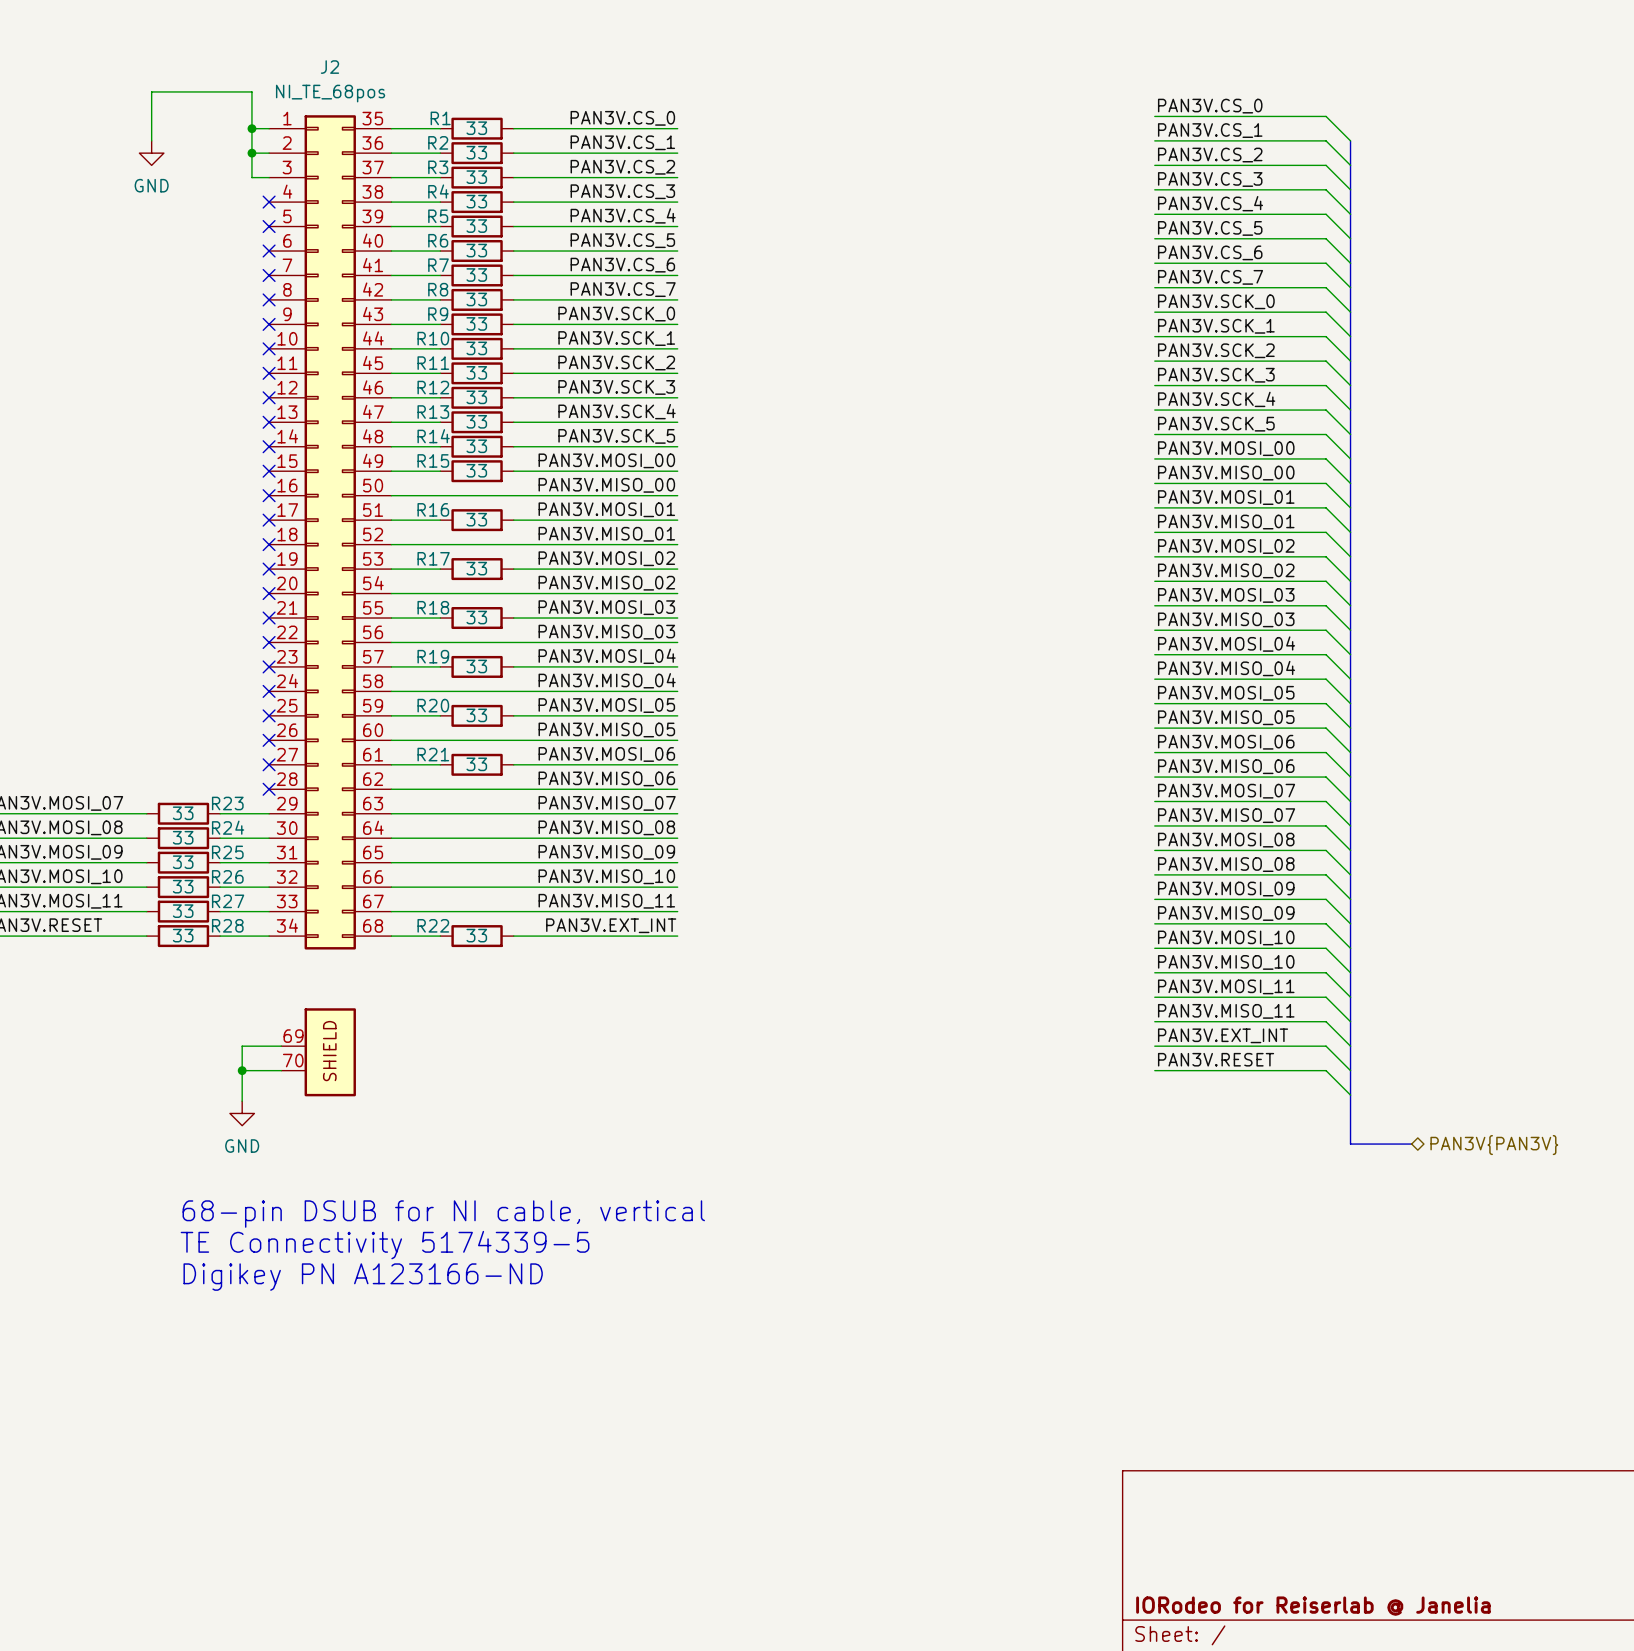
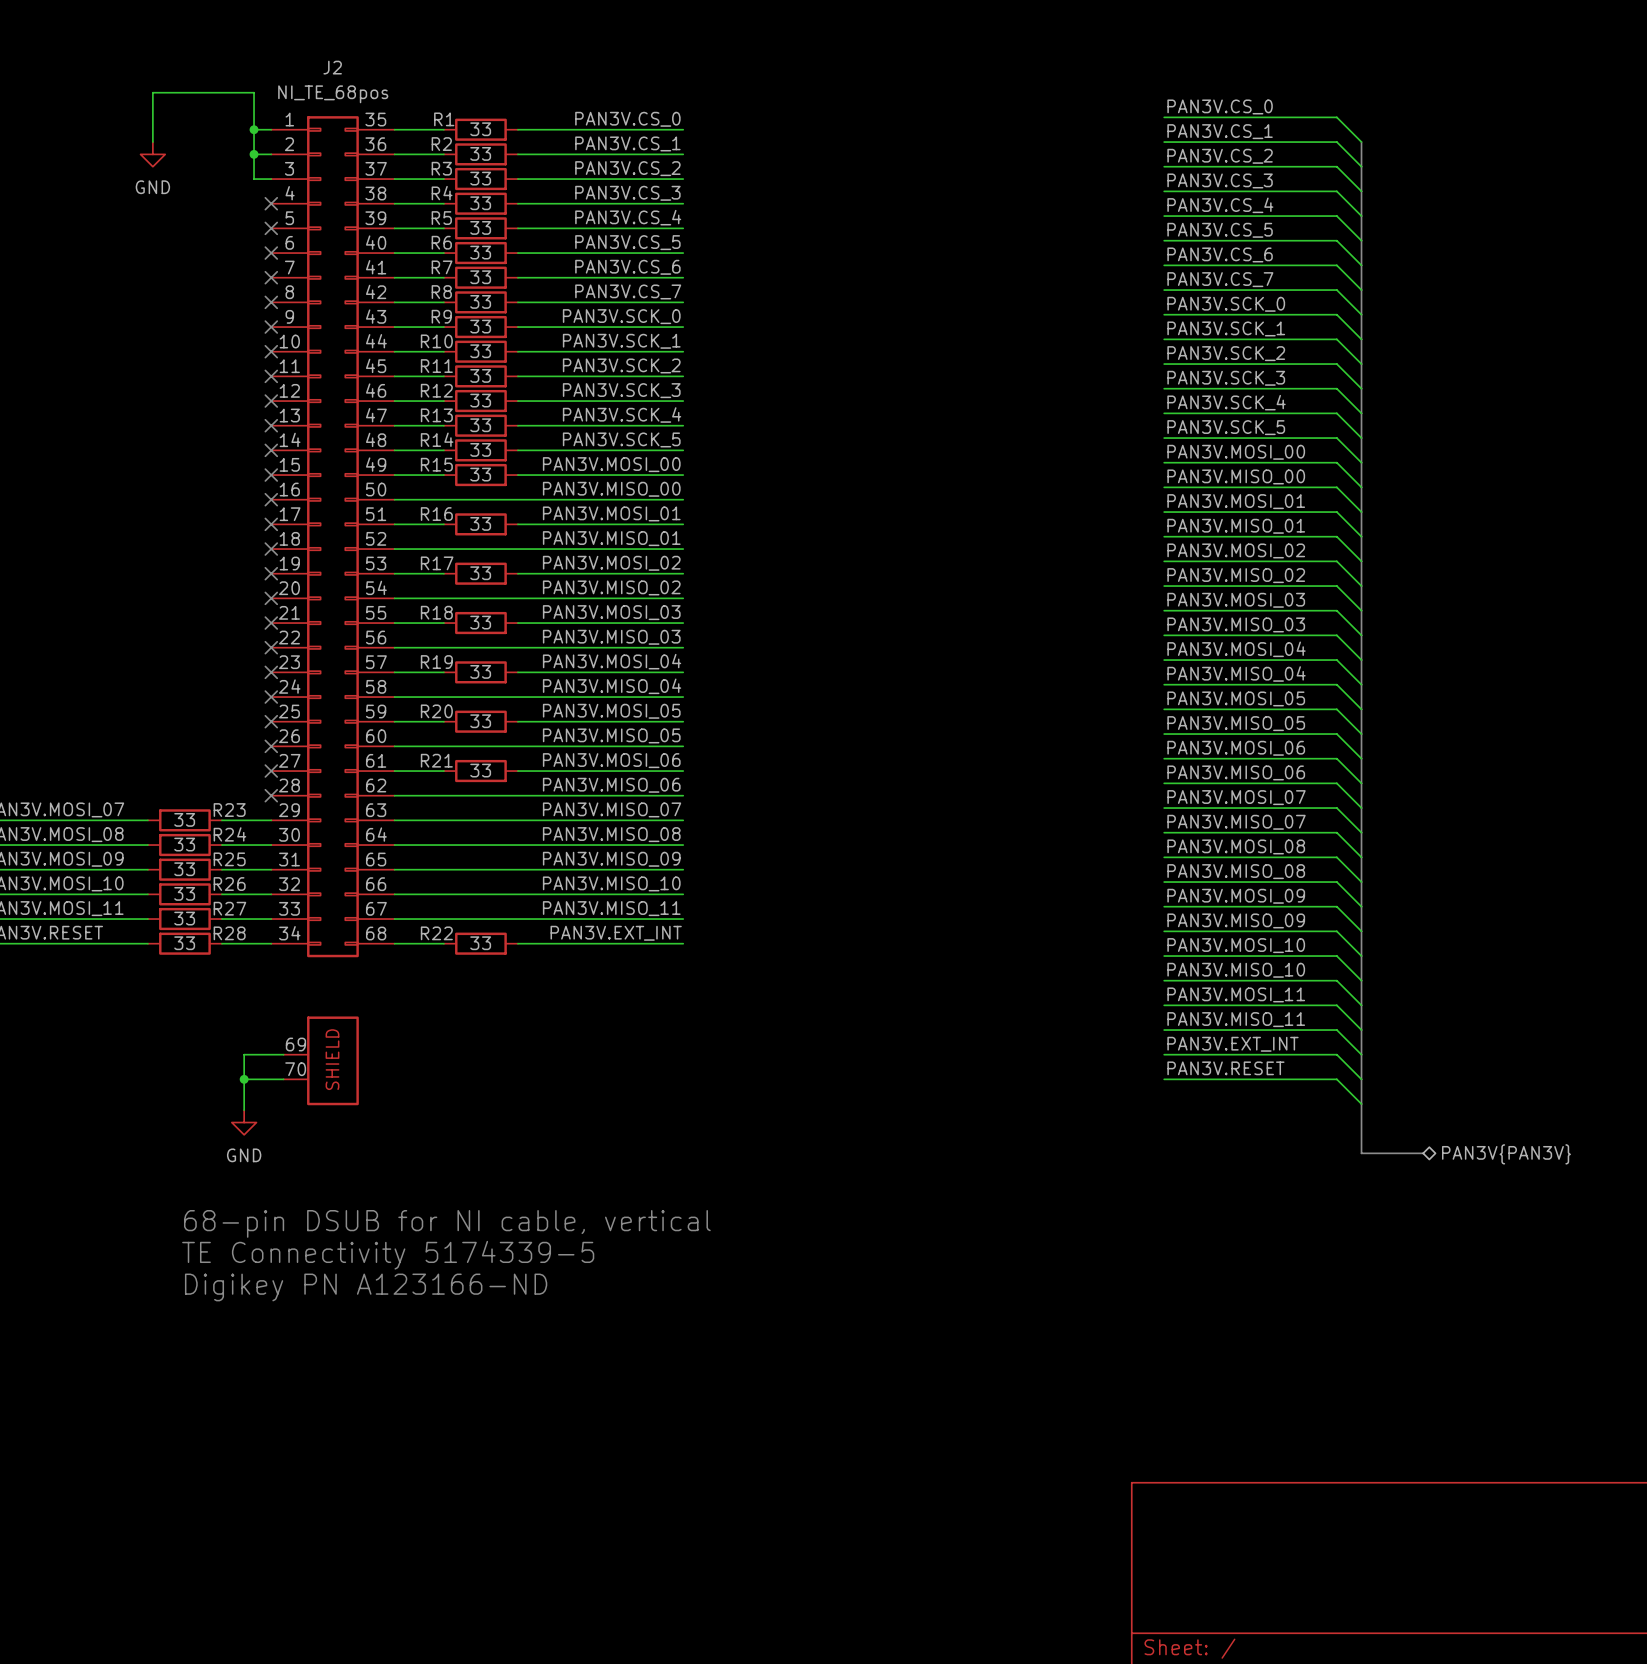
title block: IORodeo for Reiserlab @ Janelia (1313, 1606) -> none

